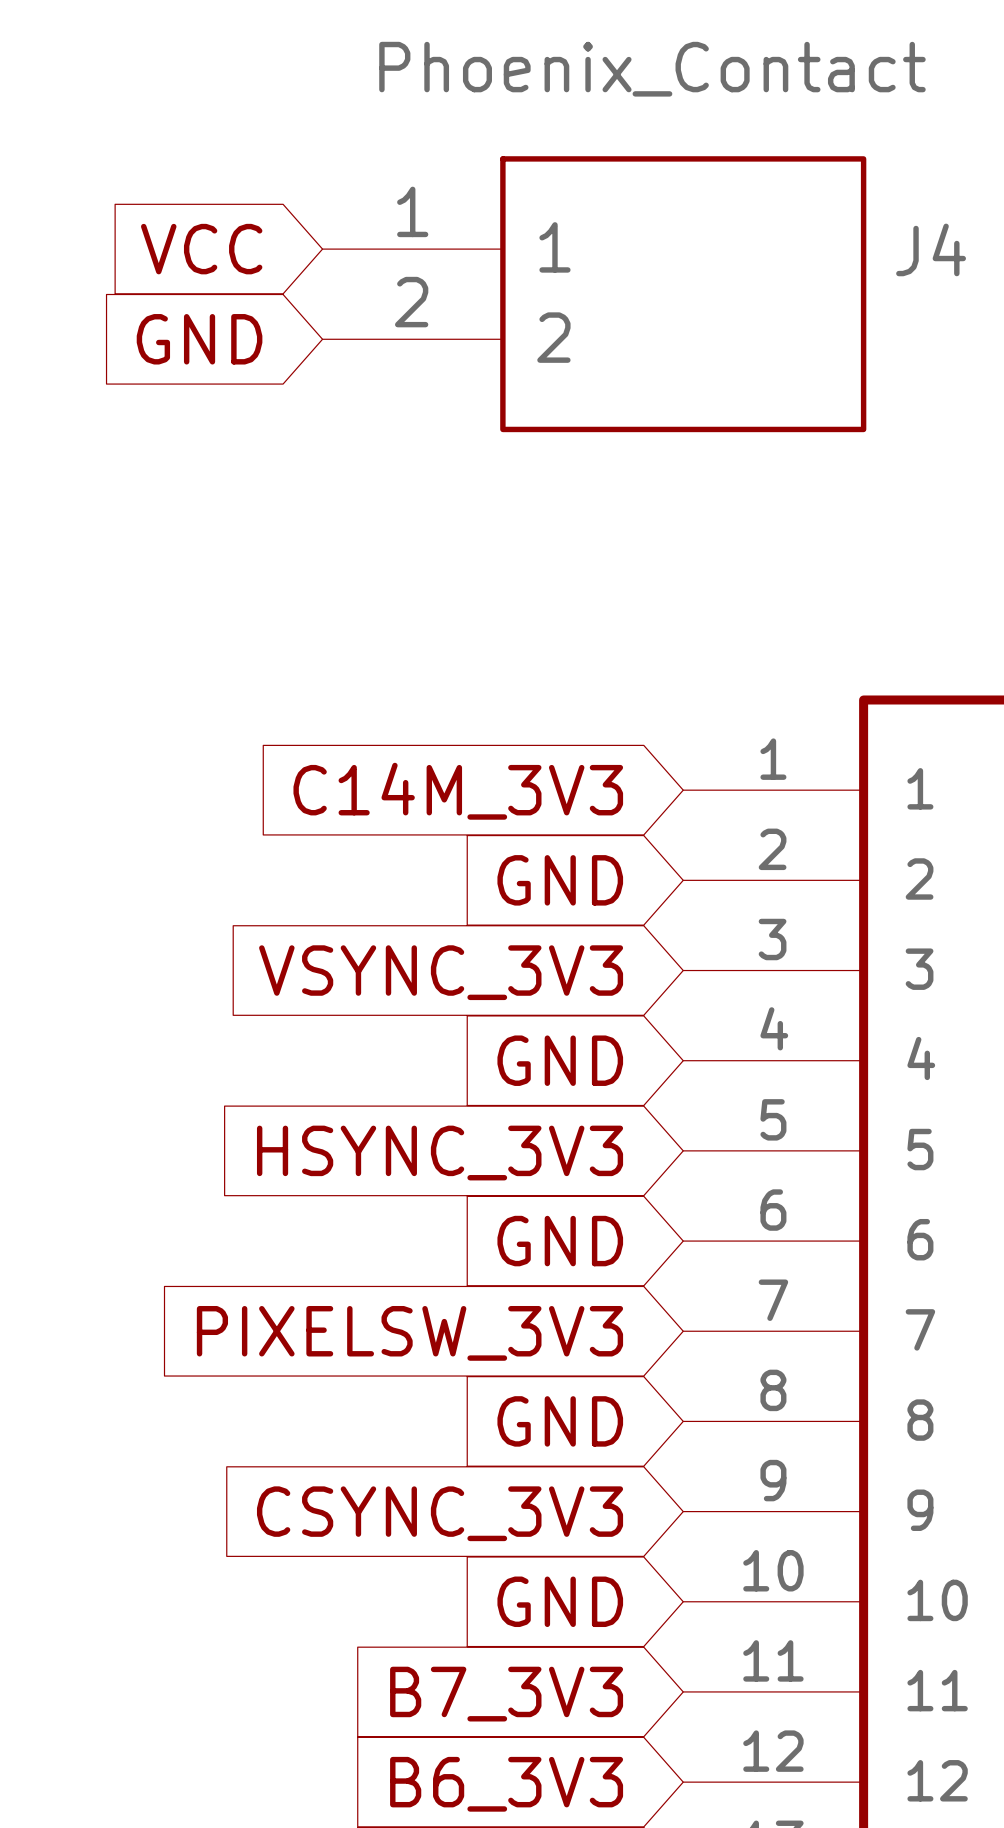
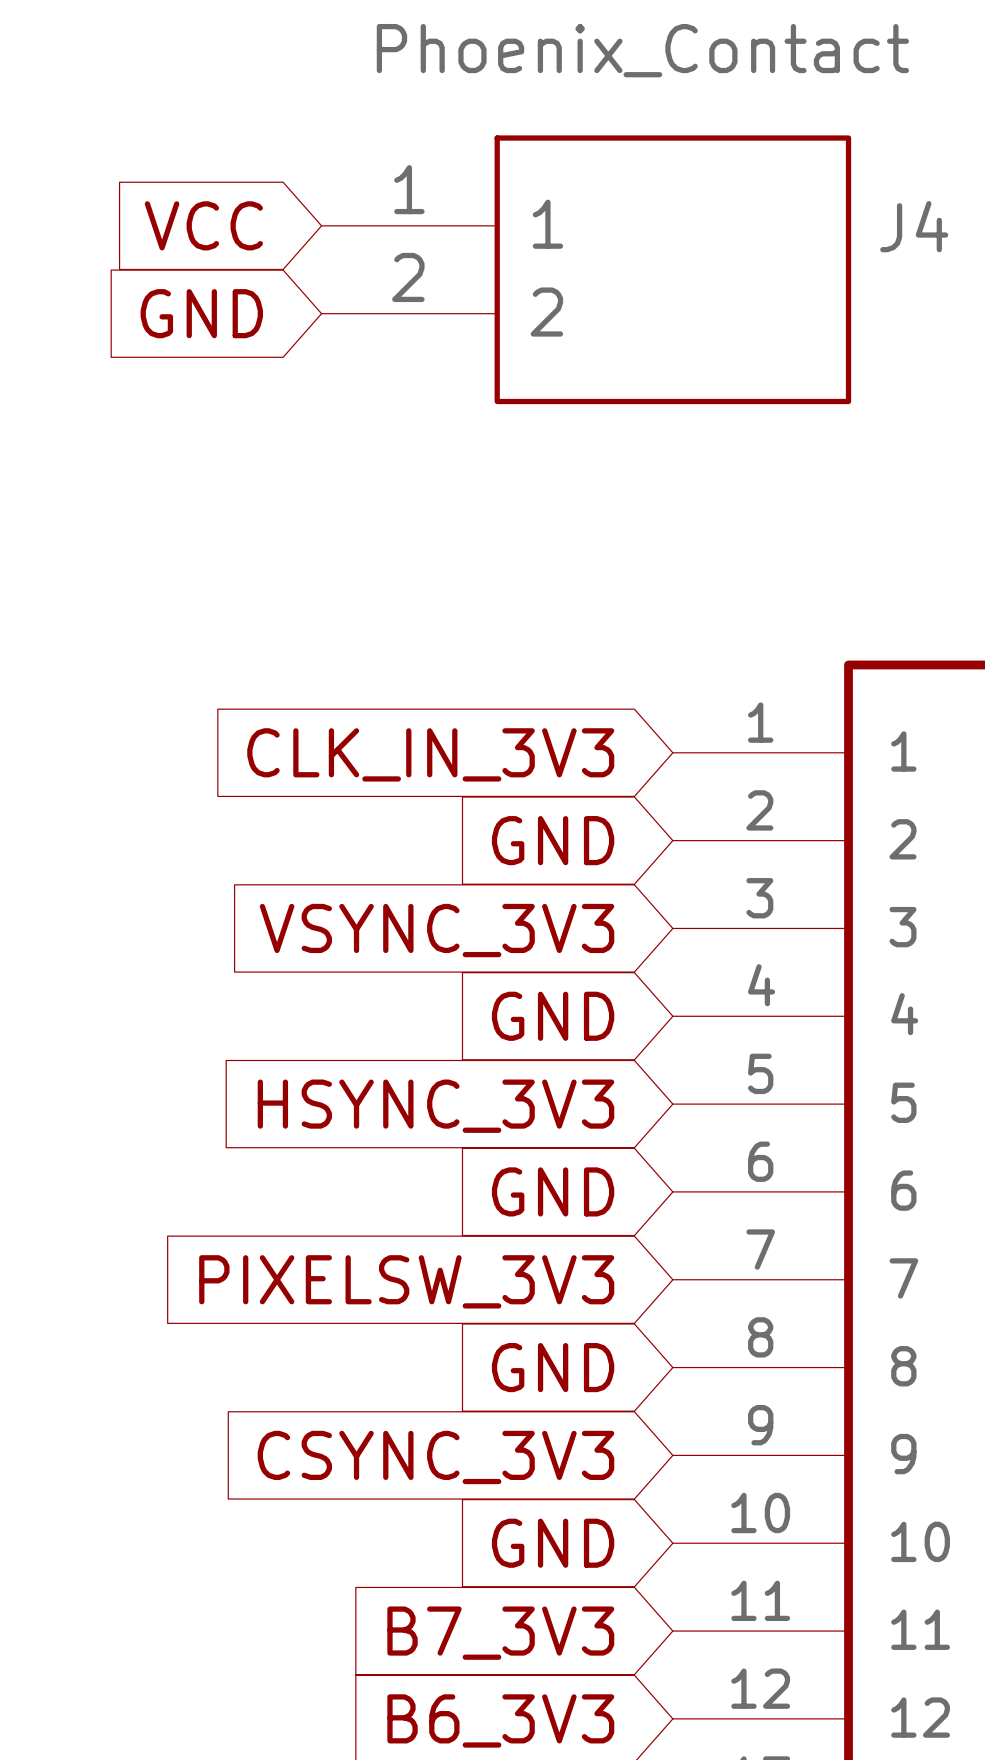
global label: C14M_3V3 (458, 791) -> CLK_IN_3V3 (430, 754)

